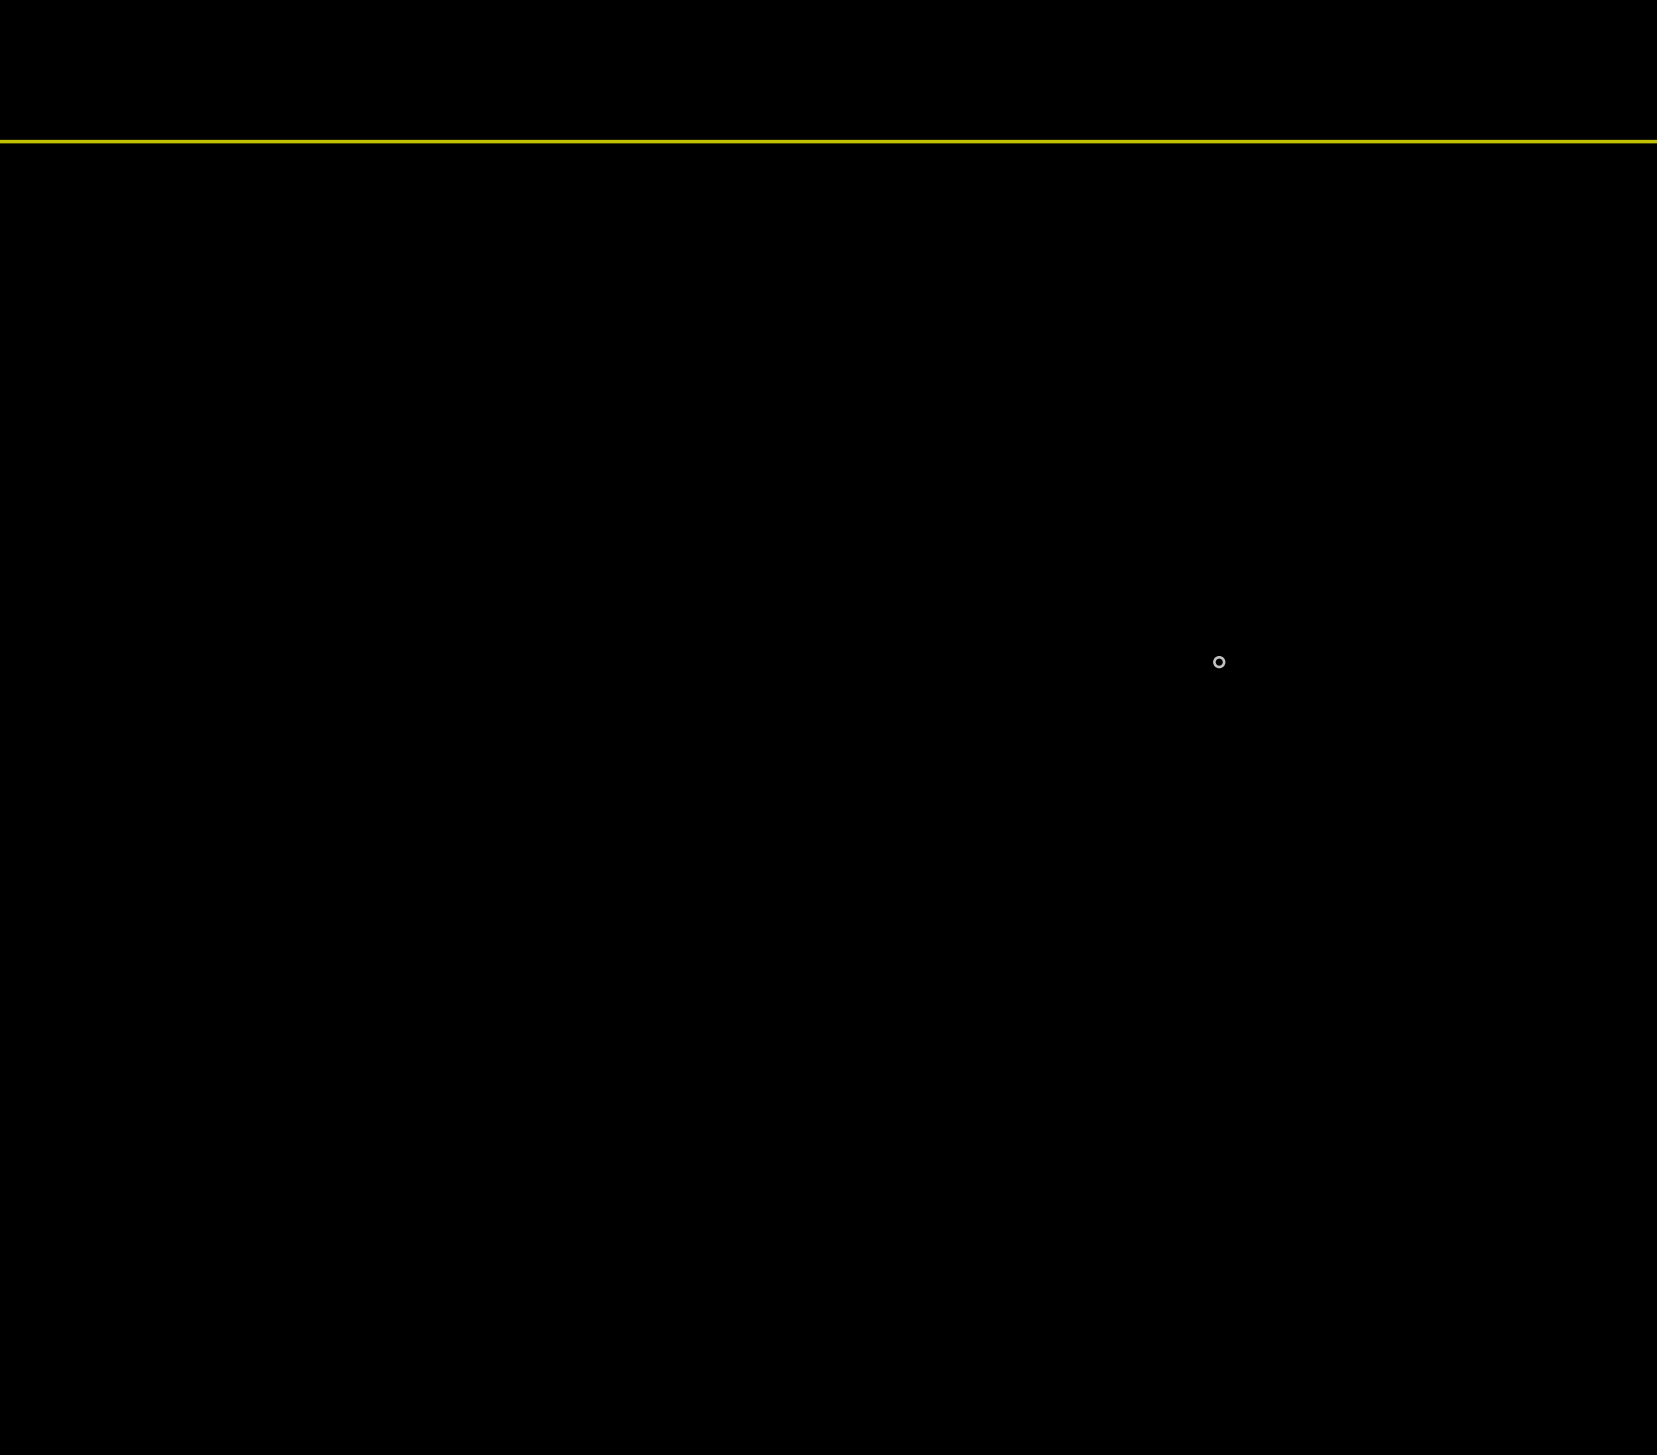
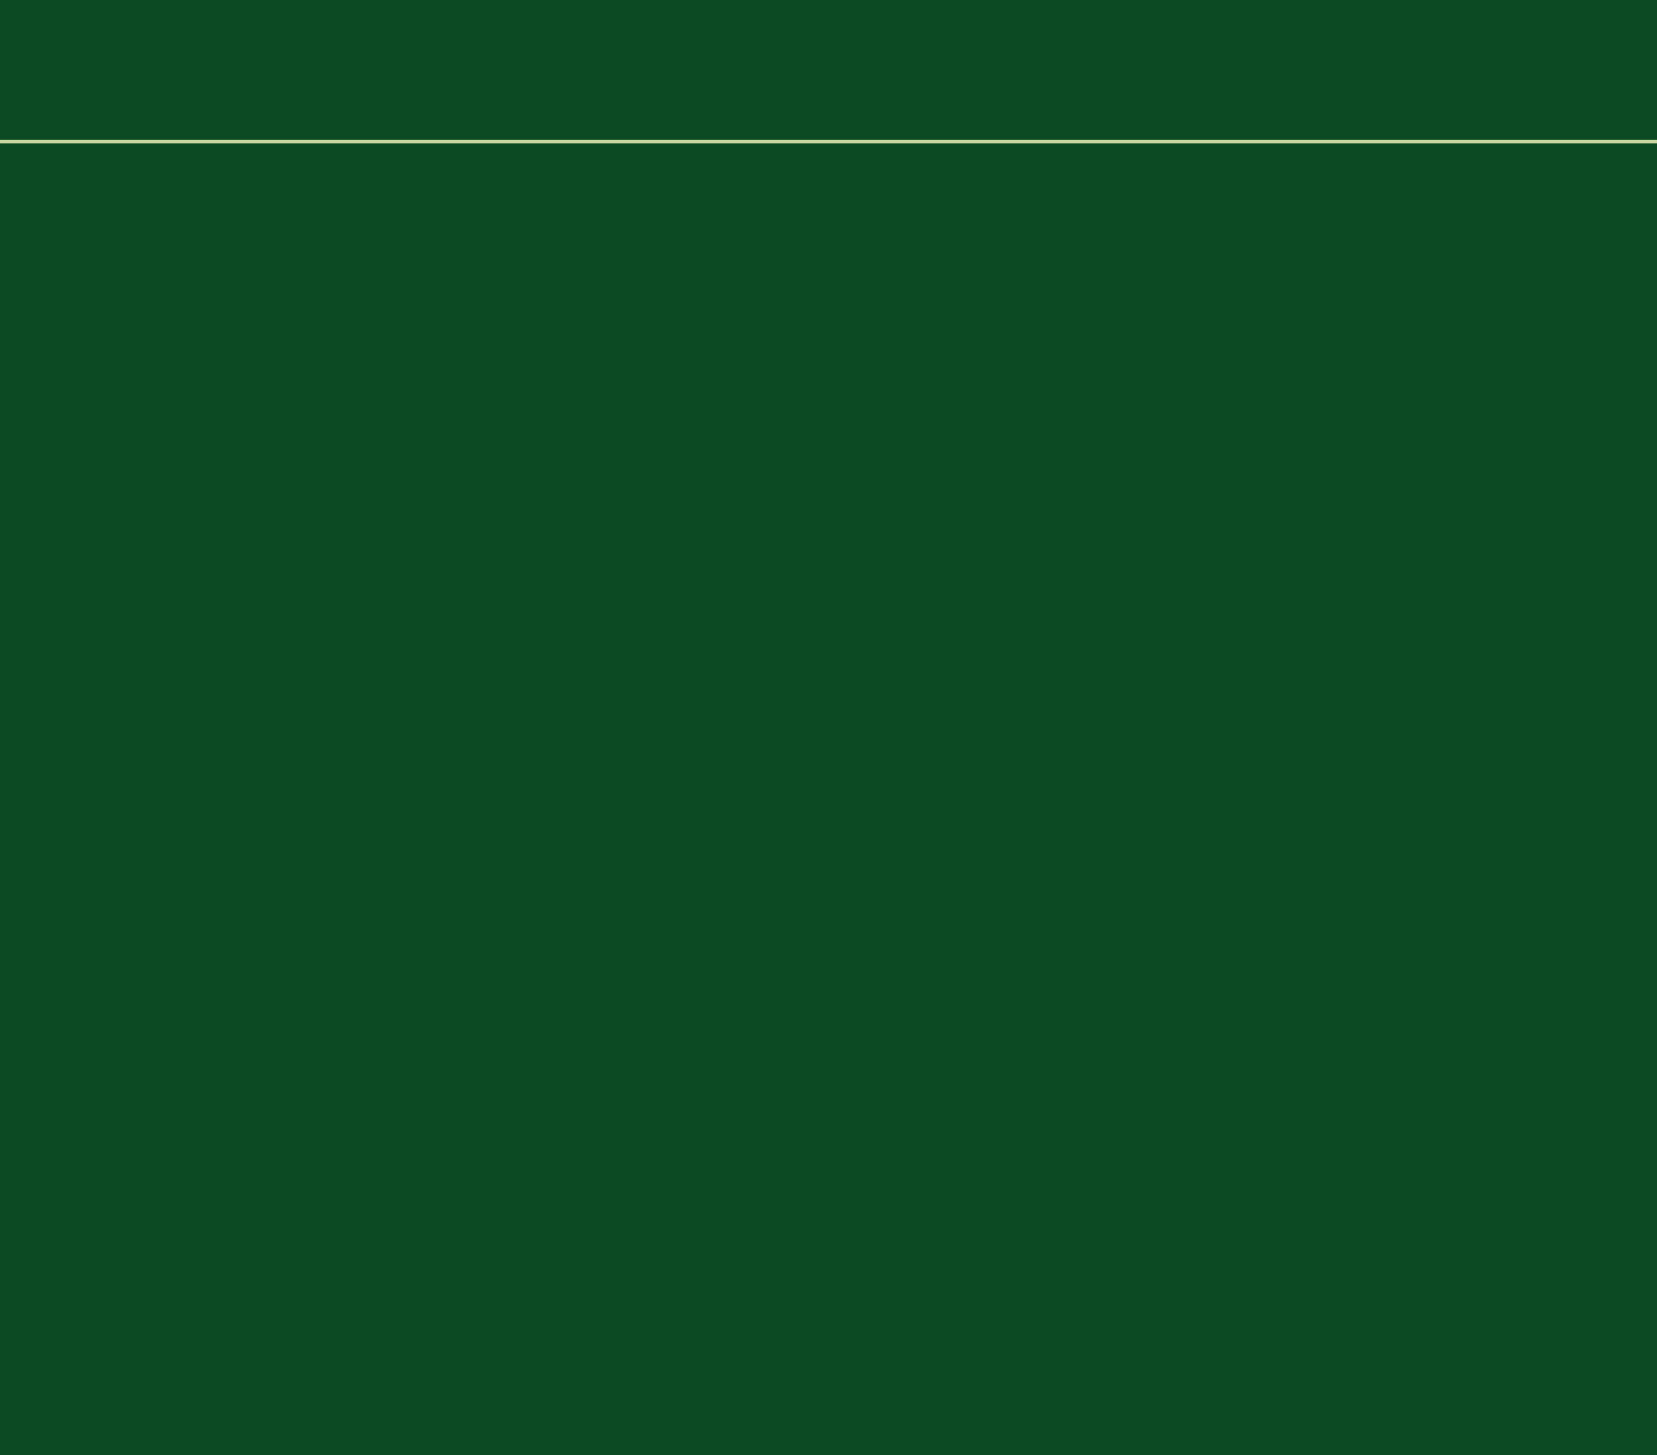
via: (1219, 662) -> none

